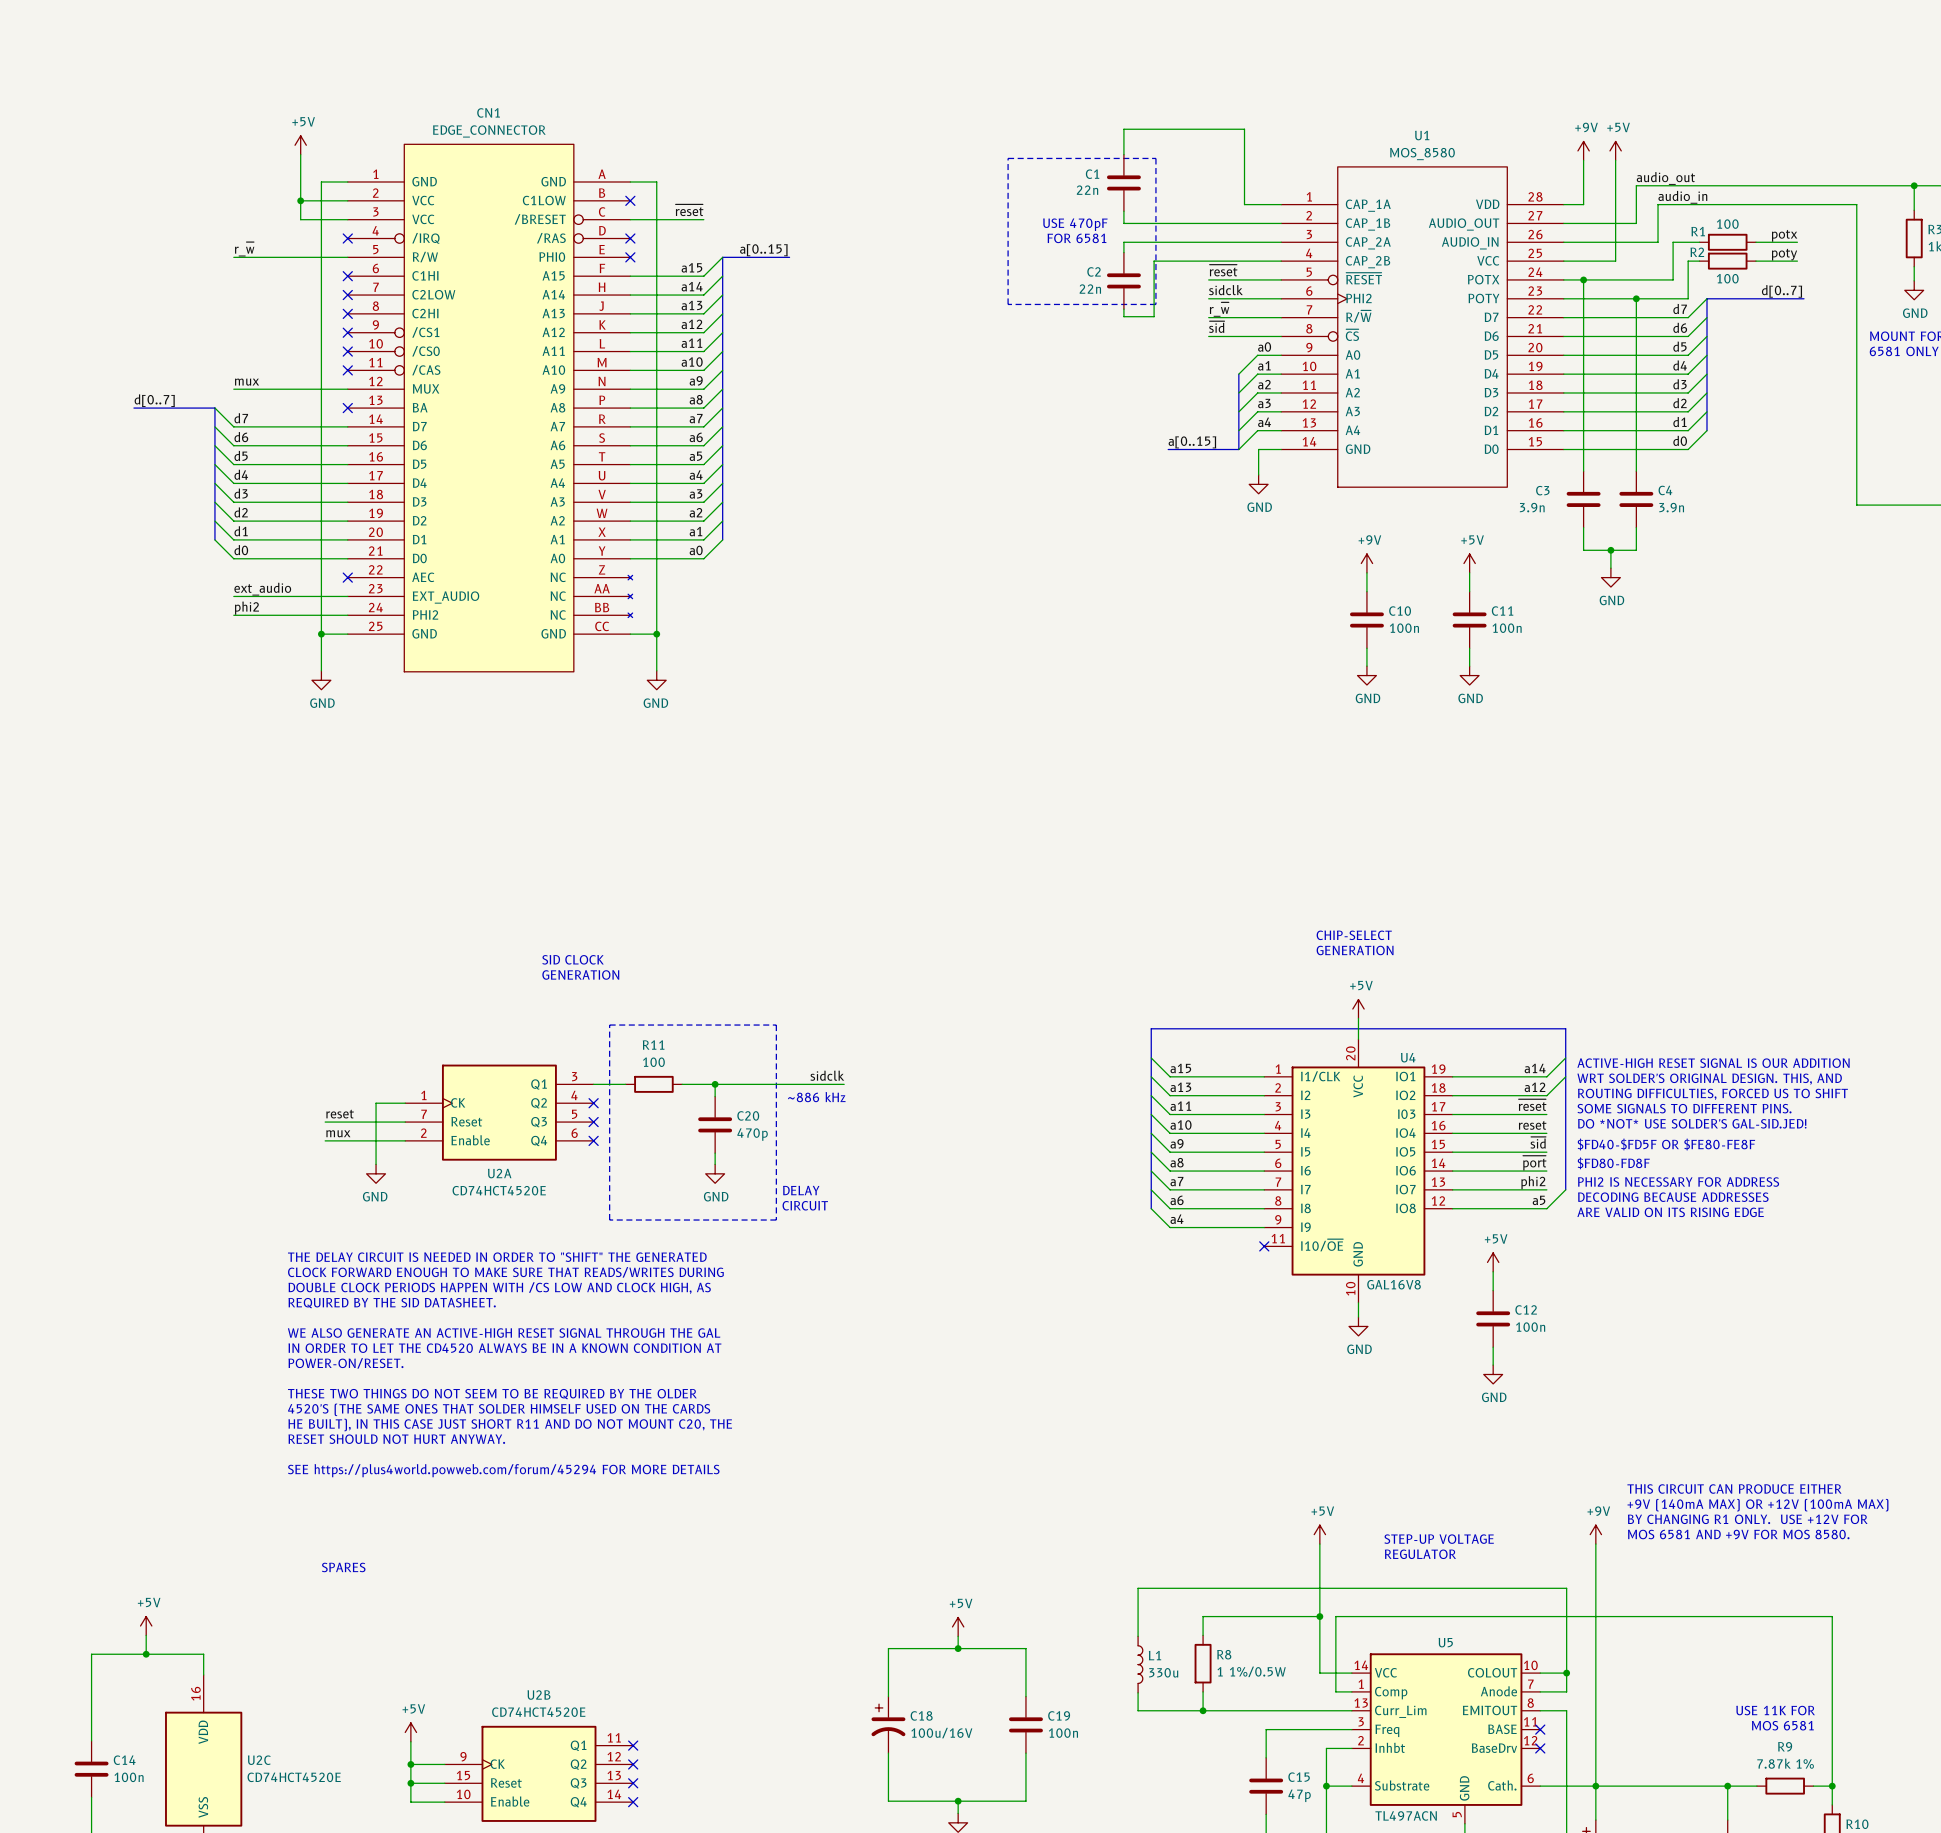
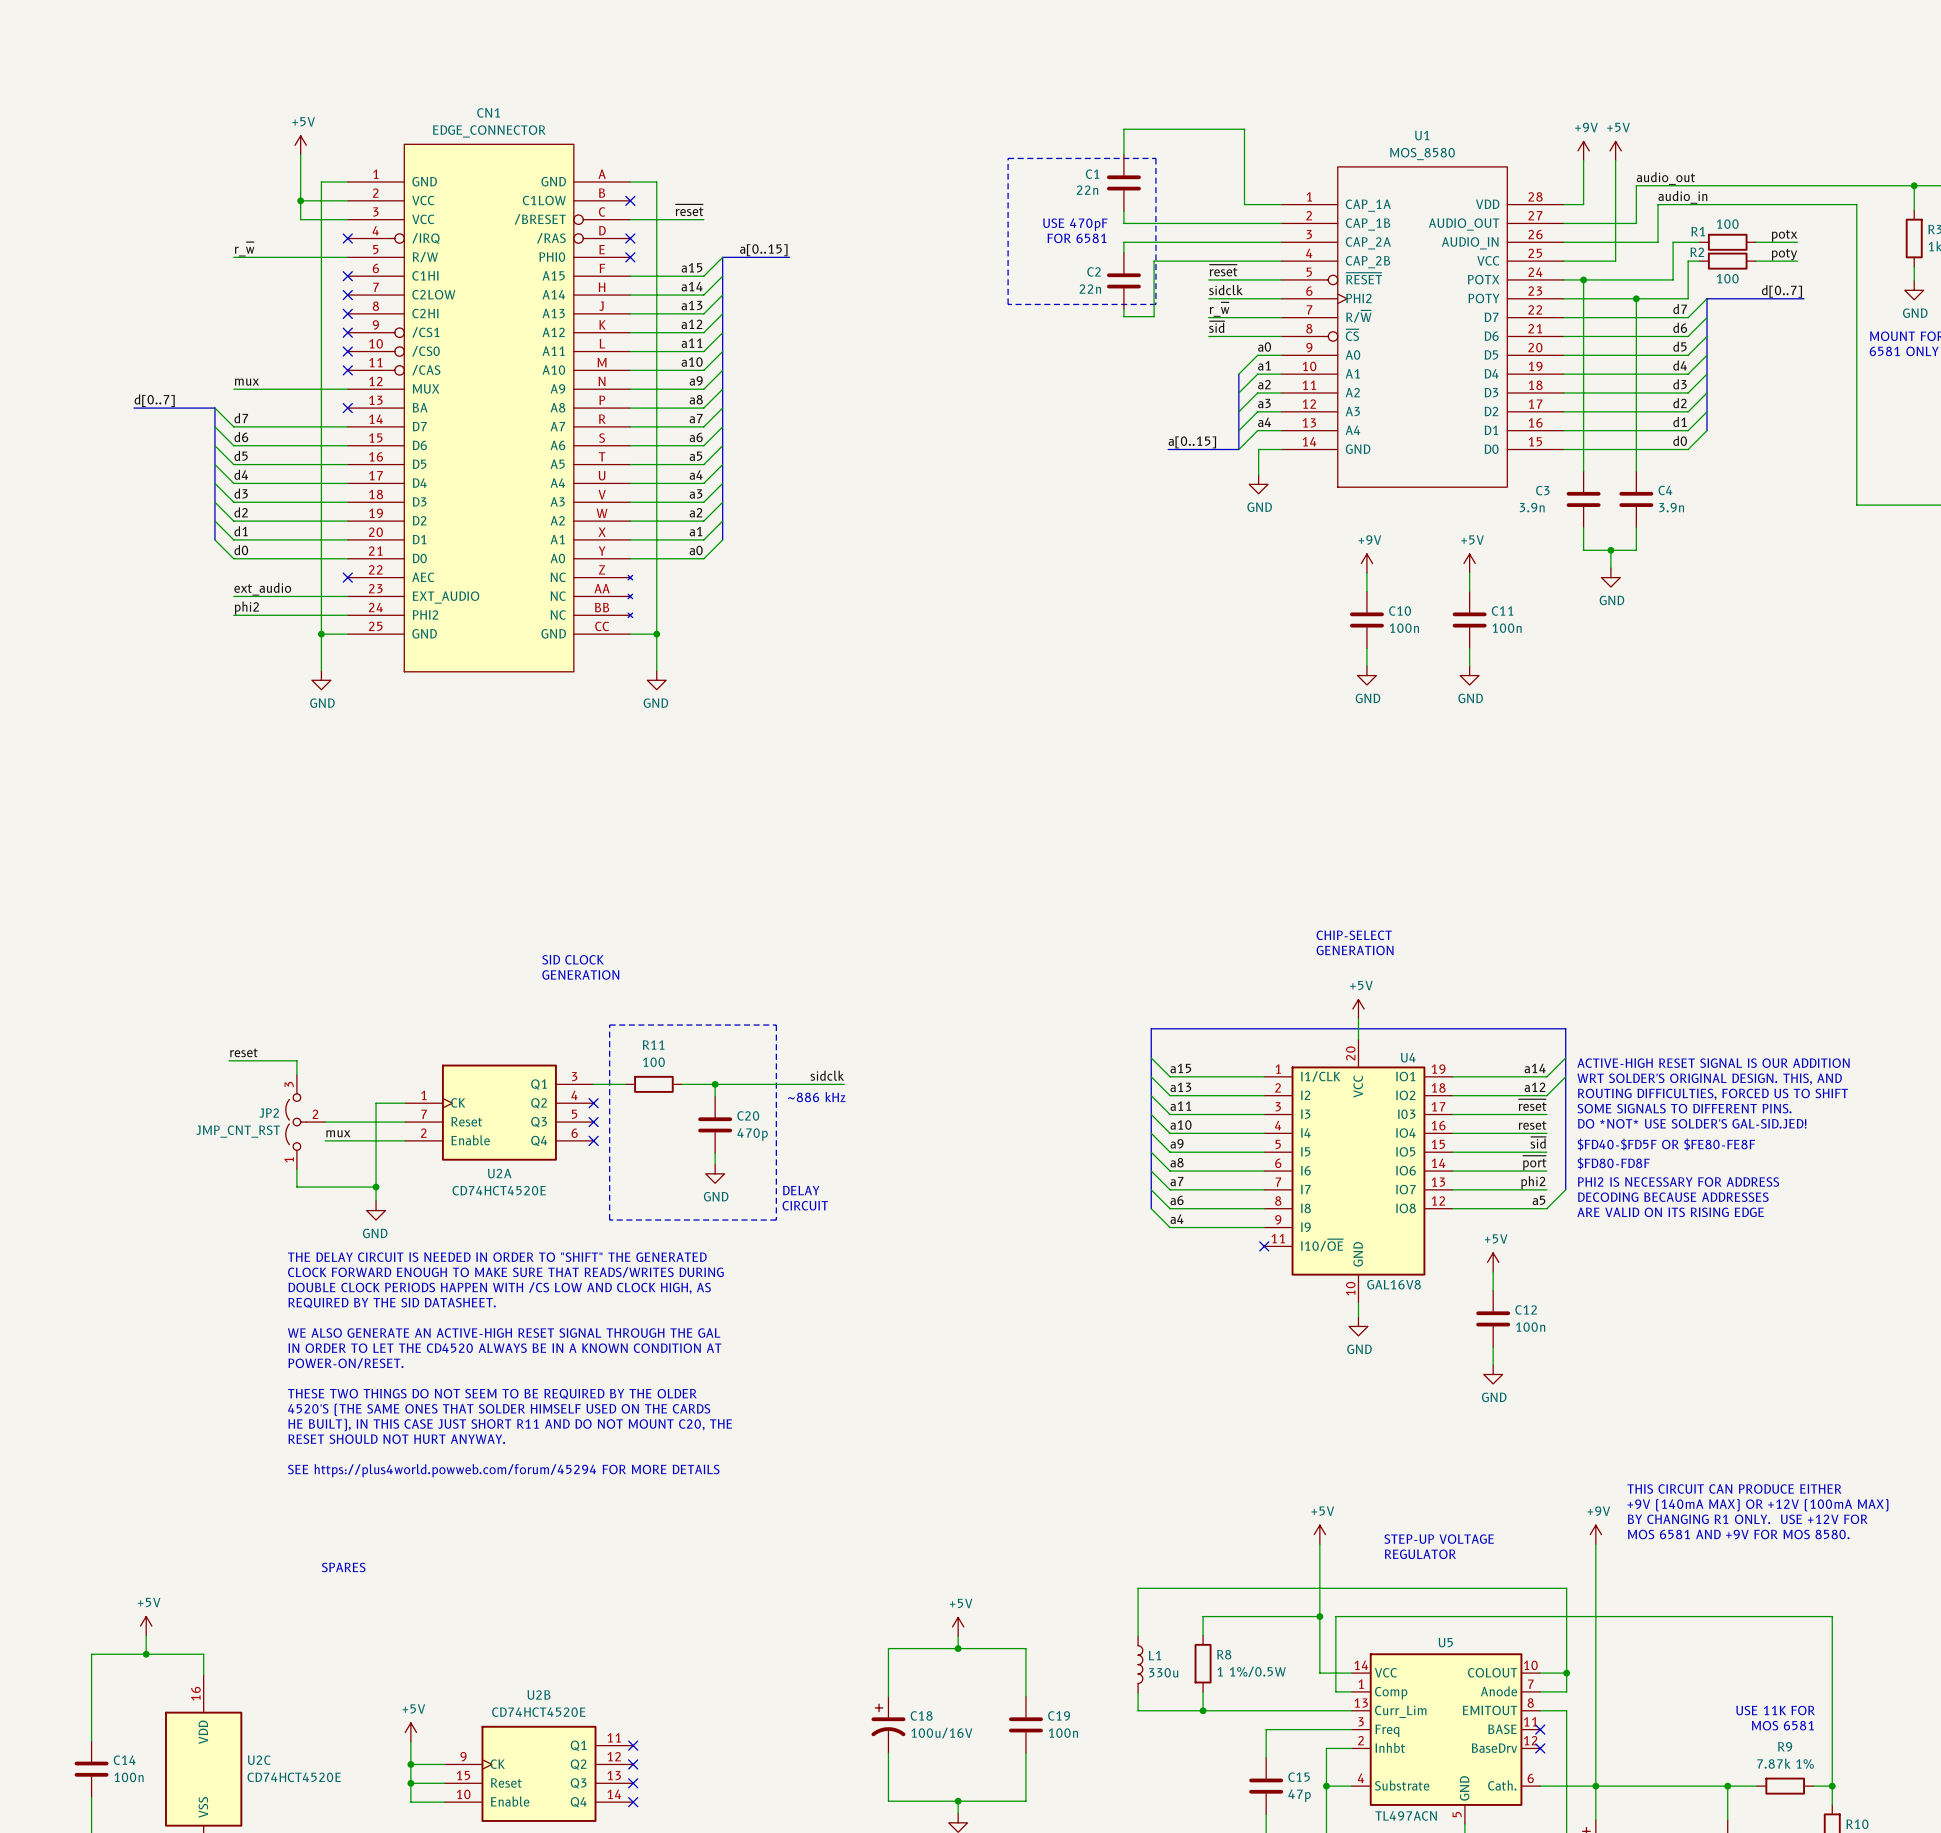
wire: none -> (229, 1060) (296, 1060) (296, 1074)
label position: reset (340, 1114) -> reset (244, 1052)
JP2: none -> JMP_CNT_RST (305, 1122)
wire: none -> (376, 1164) (376, 1201)
wire: none -> (296, 1169) (296, 1187) (376, 1187)
power symbol position: GND (376, 1173) -> GND (376, 1210)
junction: none -> (376, 1187)

